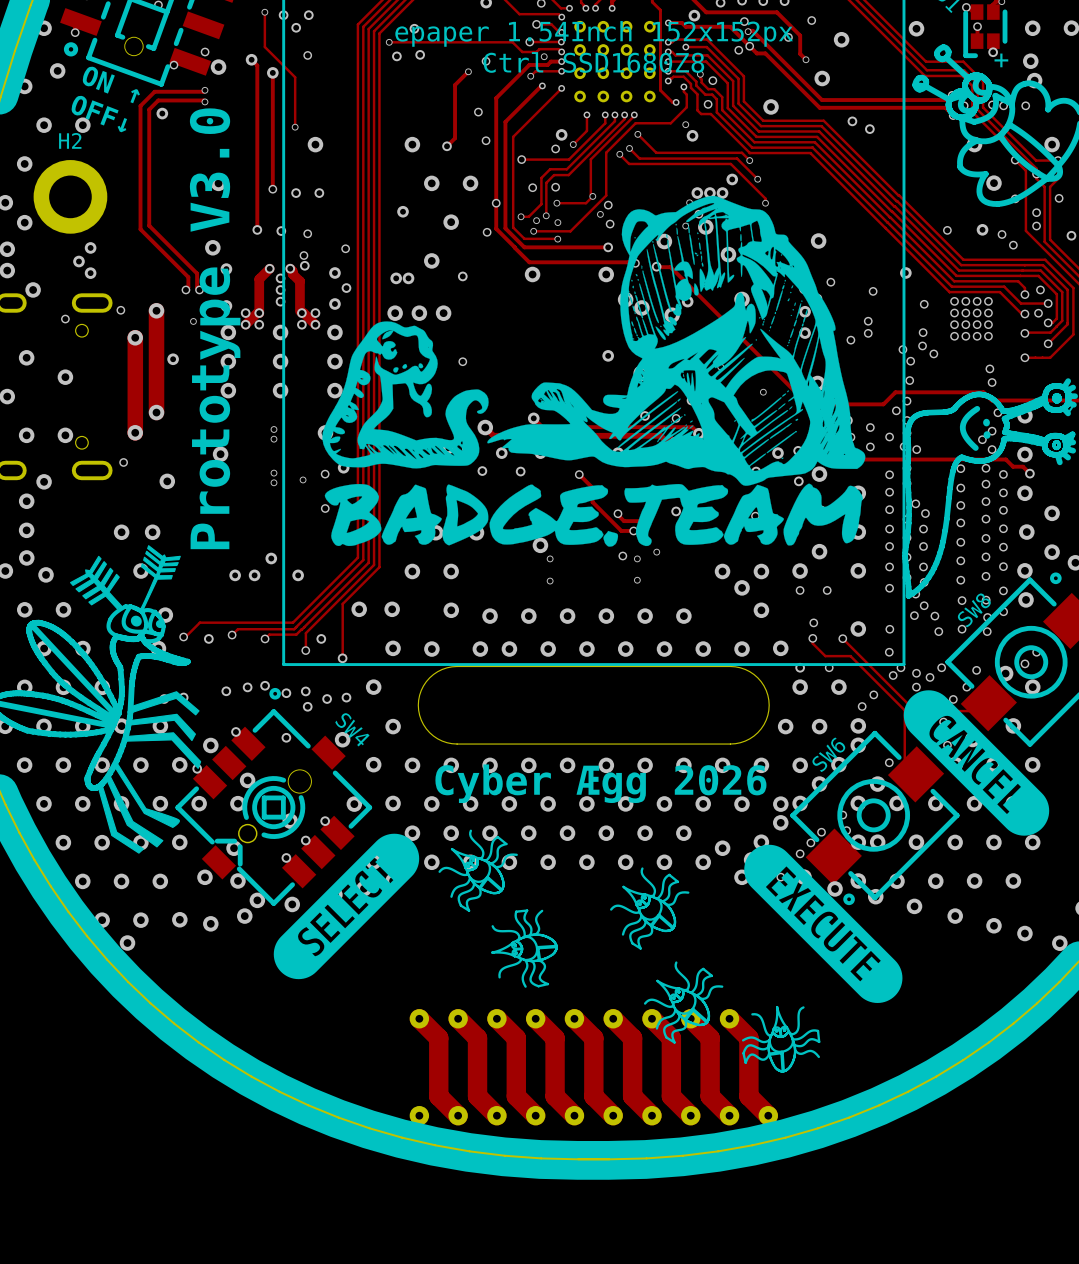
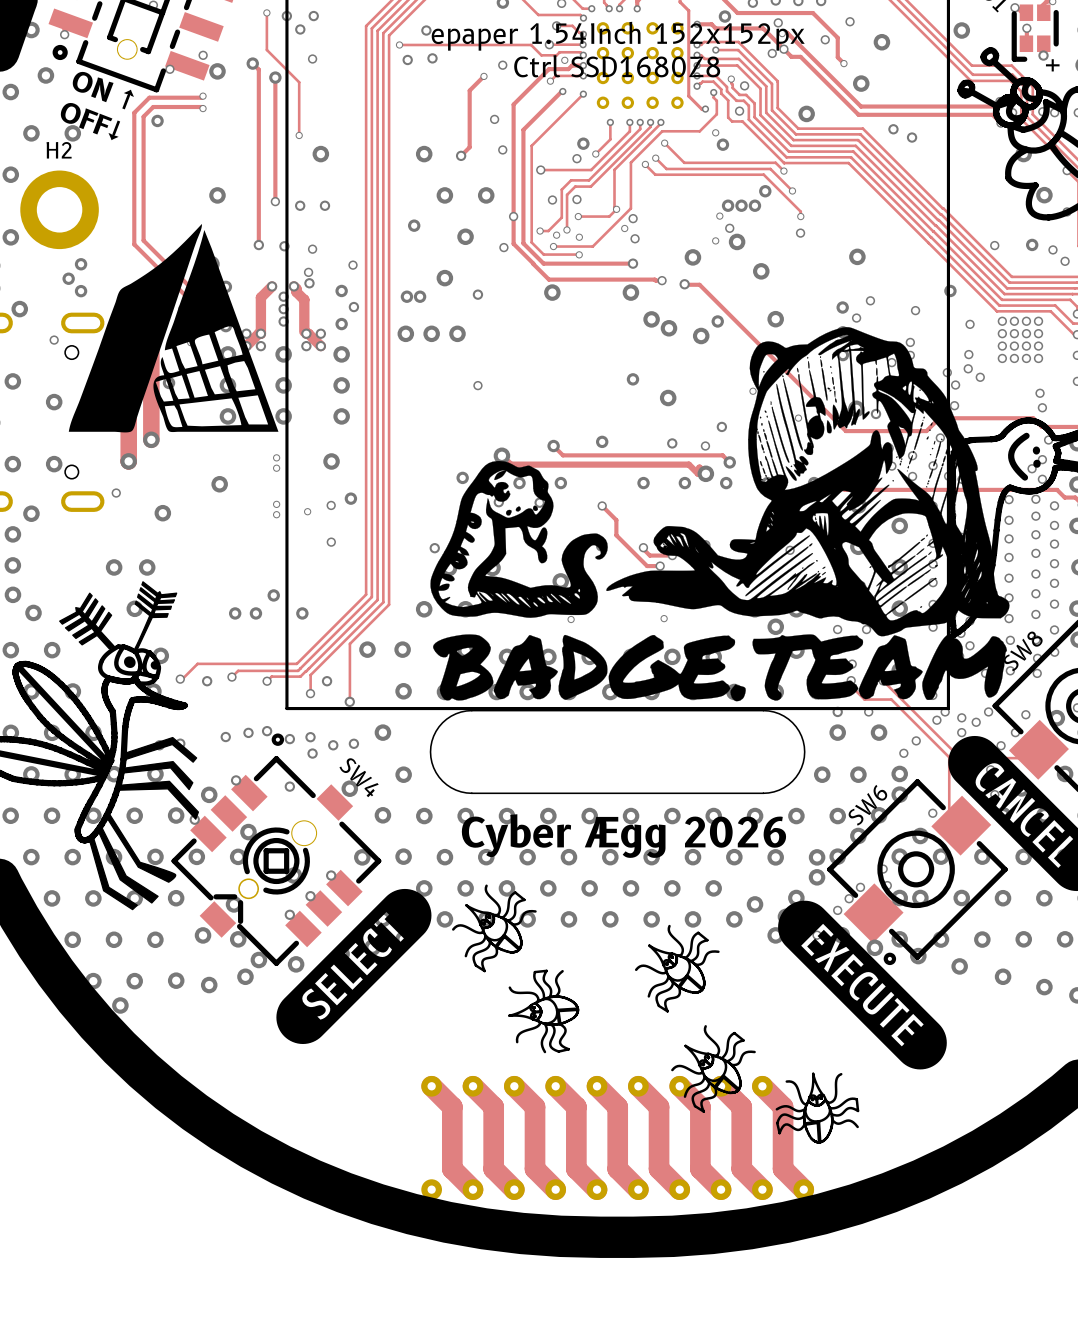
drawing: none -> [68, 223, 279, 433]
text: Prototype V3.0 (215, 328) -> none
drawing position: (593, 371) -> (719, 514)

